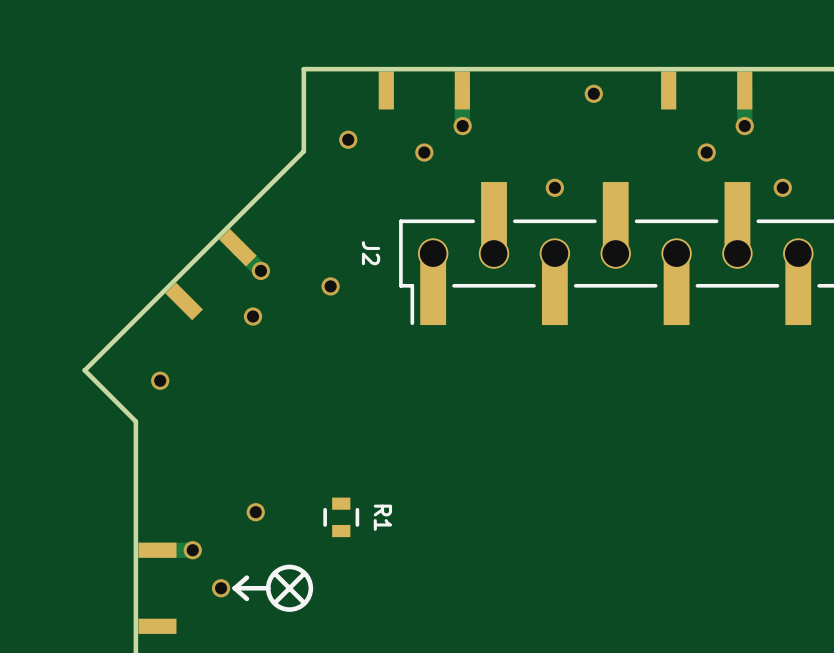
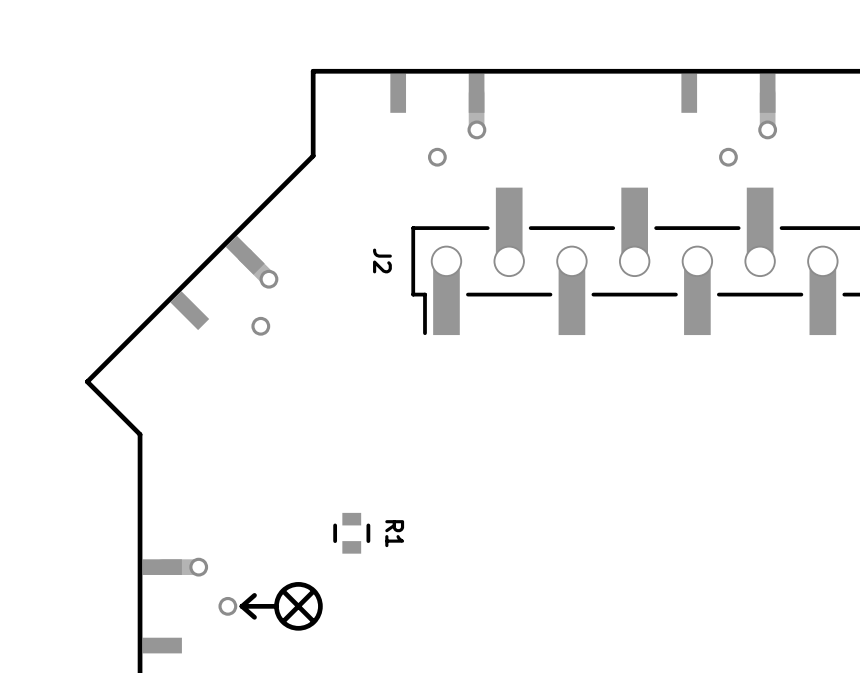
via: (593, 93) -> none
via: (348, 139) -> none
via: (554, 187) -> none
via: (782, 187) -> none
via: (330, 286) -> none
via: (160, 380) -> none
via: (255, 512) -> none

